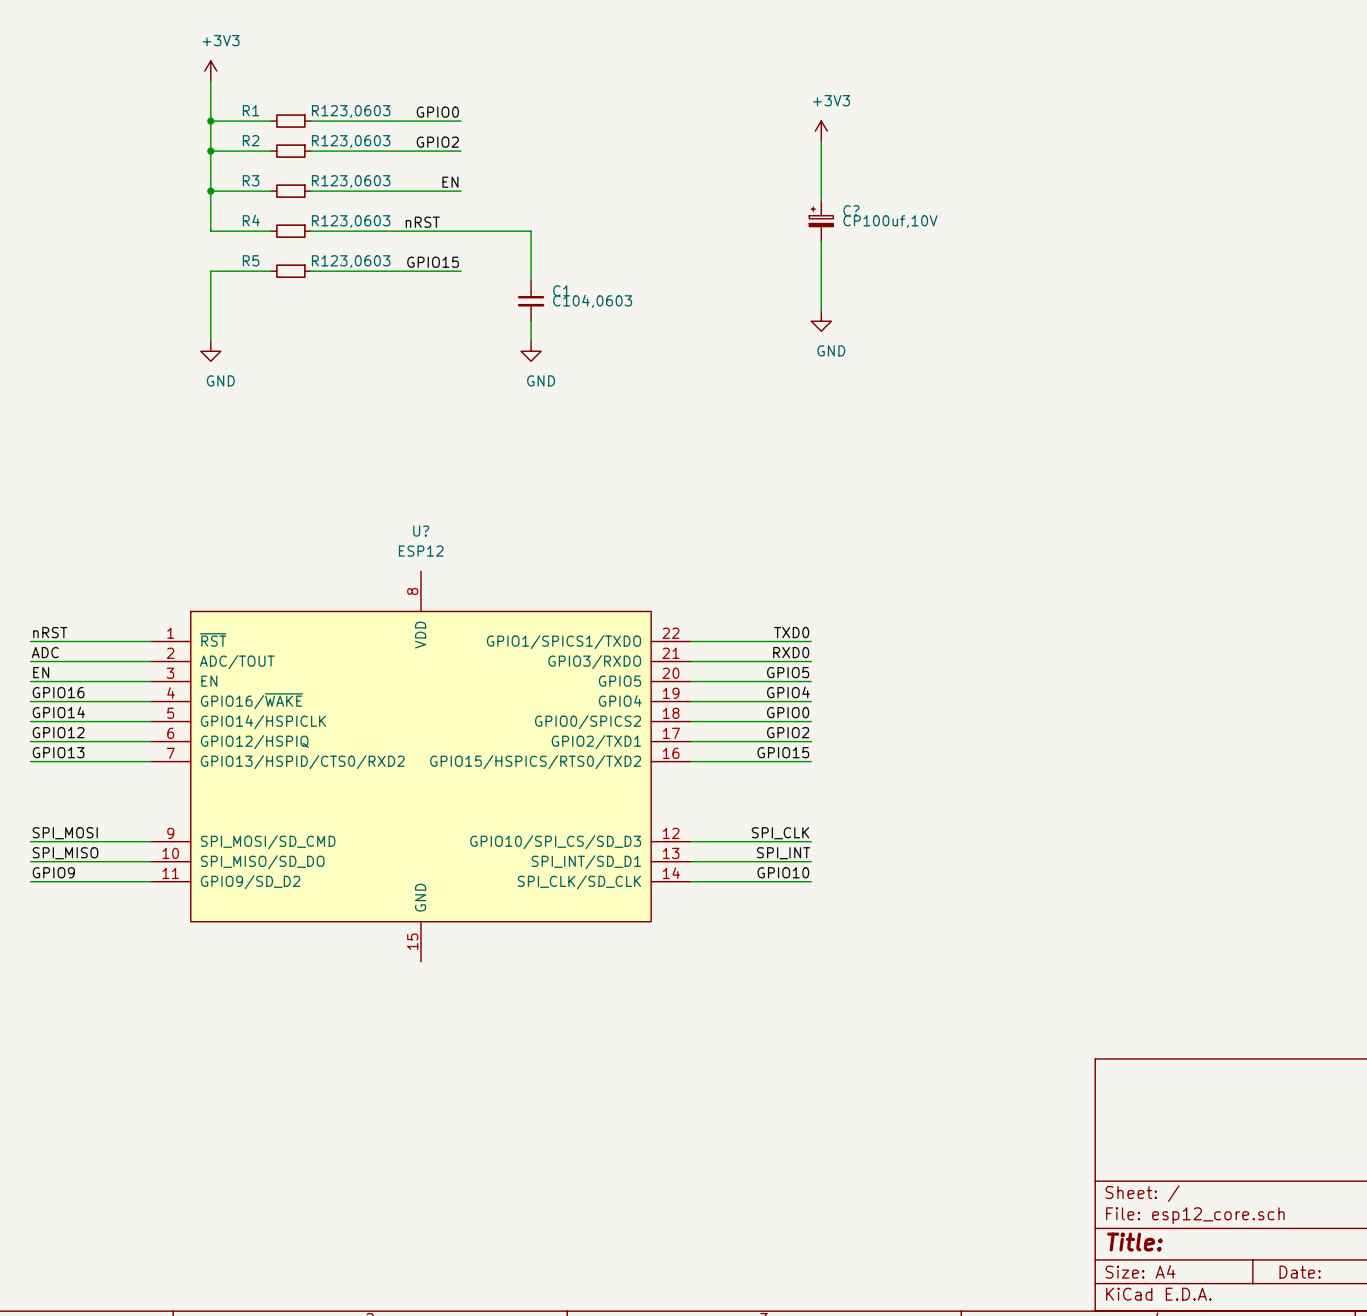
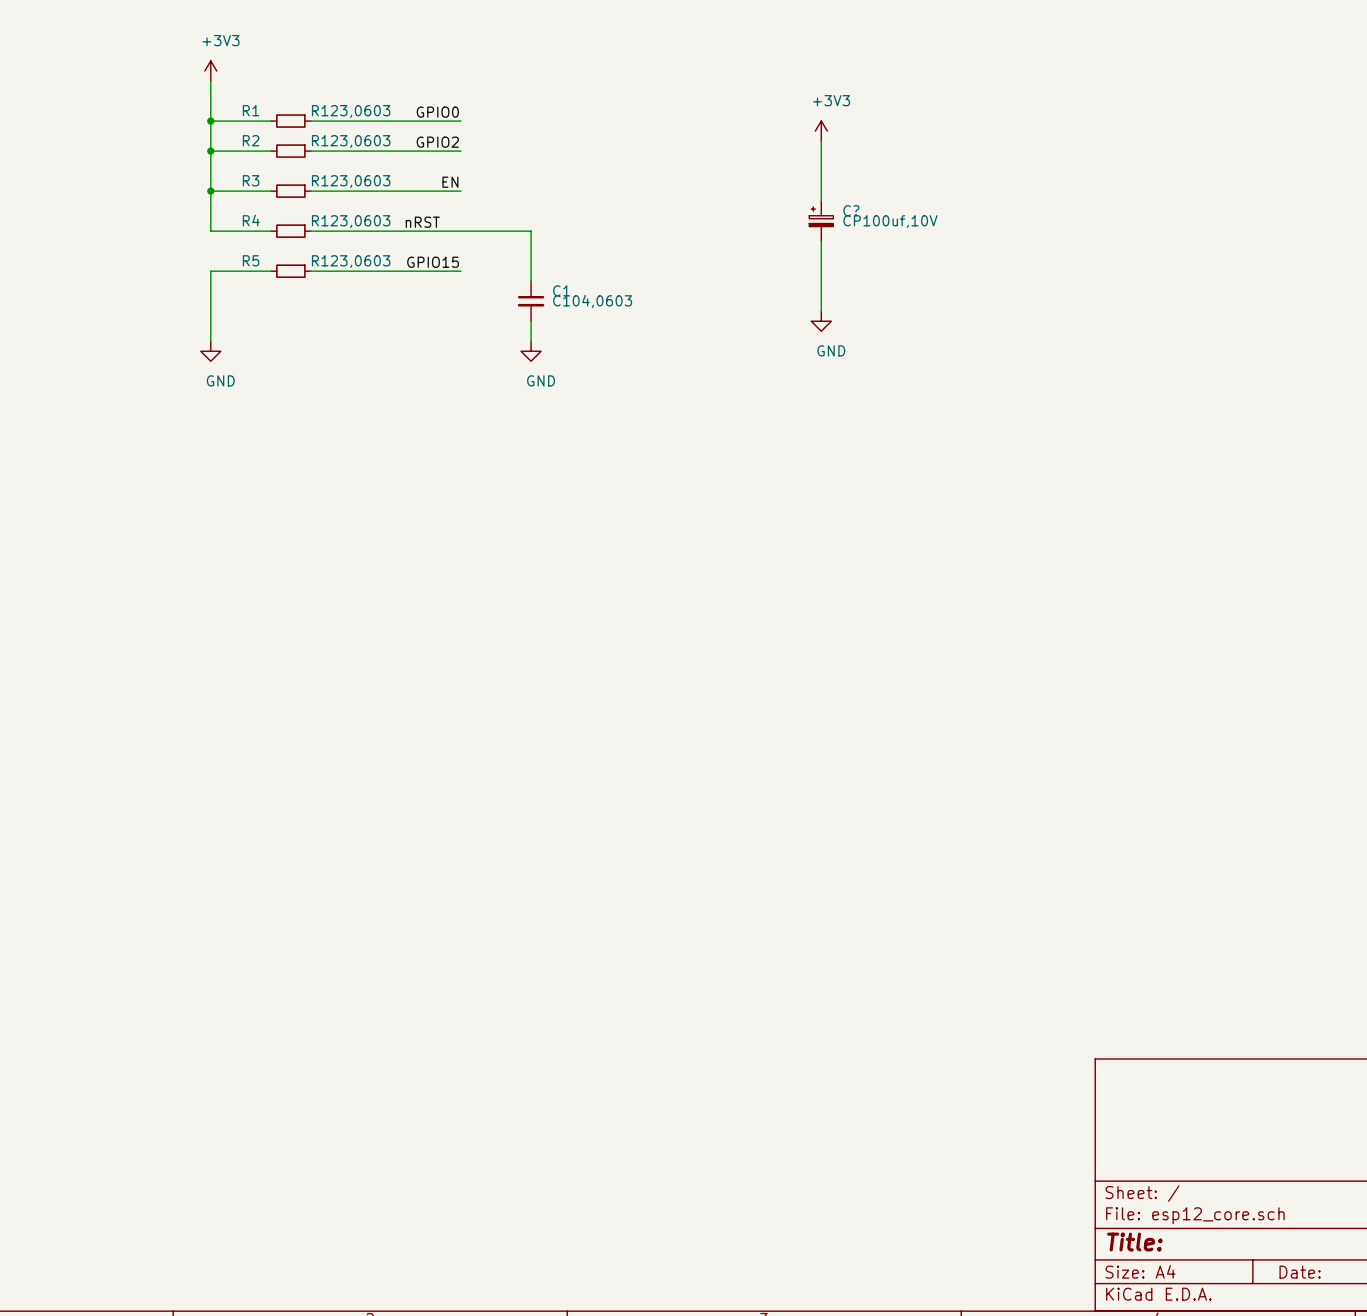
label: nRST (50, 632) -> none
label: TXD0 (791, 632) -> none
wire: (30, 641) (150, 641) -> none
wire: (691, 641) (811, 641) -> none
label: ADC (45, 652) -> none
label: RXD0 (791, 652) -> none
wire: (30, 661) (150, 661) -> none
wire: (691, 661) (811, 661) -> none
label: EN (41, 672) -> none
label: GPIO5 (788, 672) -> none
wire: (30, 681) (150, 681) -> none
wire: (691, 681) (811, 681) -> none
label: GPIO16 (58, 692) -> none
label: GPIO4 (788, 692) -> none
wire: (30, 701) (150, 701) -> none
wire: (691, 701) (811, 701) -> none
label: GPIO14 (58, 712) -> none
label: GPIO0 (788, 712) -> none
wire: (30, 721) (150, 721) -> none
wire: (691, 721) (811, 721) -> none
label: GPIO12 (58, 732) -> none
label: GPIO2 (788, 732) -> none
wire: (30, 741) (150, 741) -> none
wire: (691, 741) (811, 741) -> none
label: GPIO13 (58, 752) -> none
label: GPIO15 (783, 752) -> none
wire: (30, 761) (150, 761) -> none
wire: (691, 761) (811, 761) -> none
U?: ESP12 (420, 766) -> none
label: SPI_MOSI (65, 833) -> none
label: SPI_CLK (780, 833) -> none
wire: (30, 841) (150, 841) -> none
wire: (691, 841) (811, 841) -> none
label: SPI_MISO (65, 853) -> none
label: SPI_INT (783, 853) -> none
wire: (30, 861) (150, 861) -> none
wire: (691, 861) (811, 861) -> none
label: GPIO9 (53, 872) -> none
label: GPIO10 (783, 872) -> none
wire: (30, 881) (150, 881) -> none
wire: (691, 881) (811, 881) -> none

